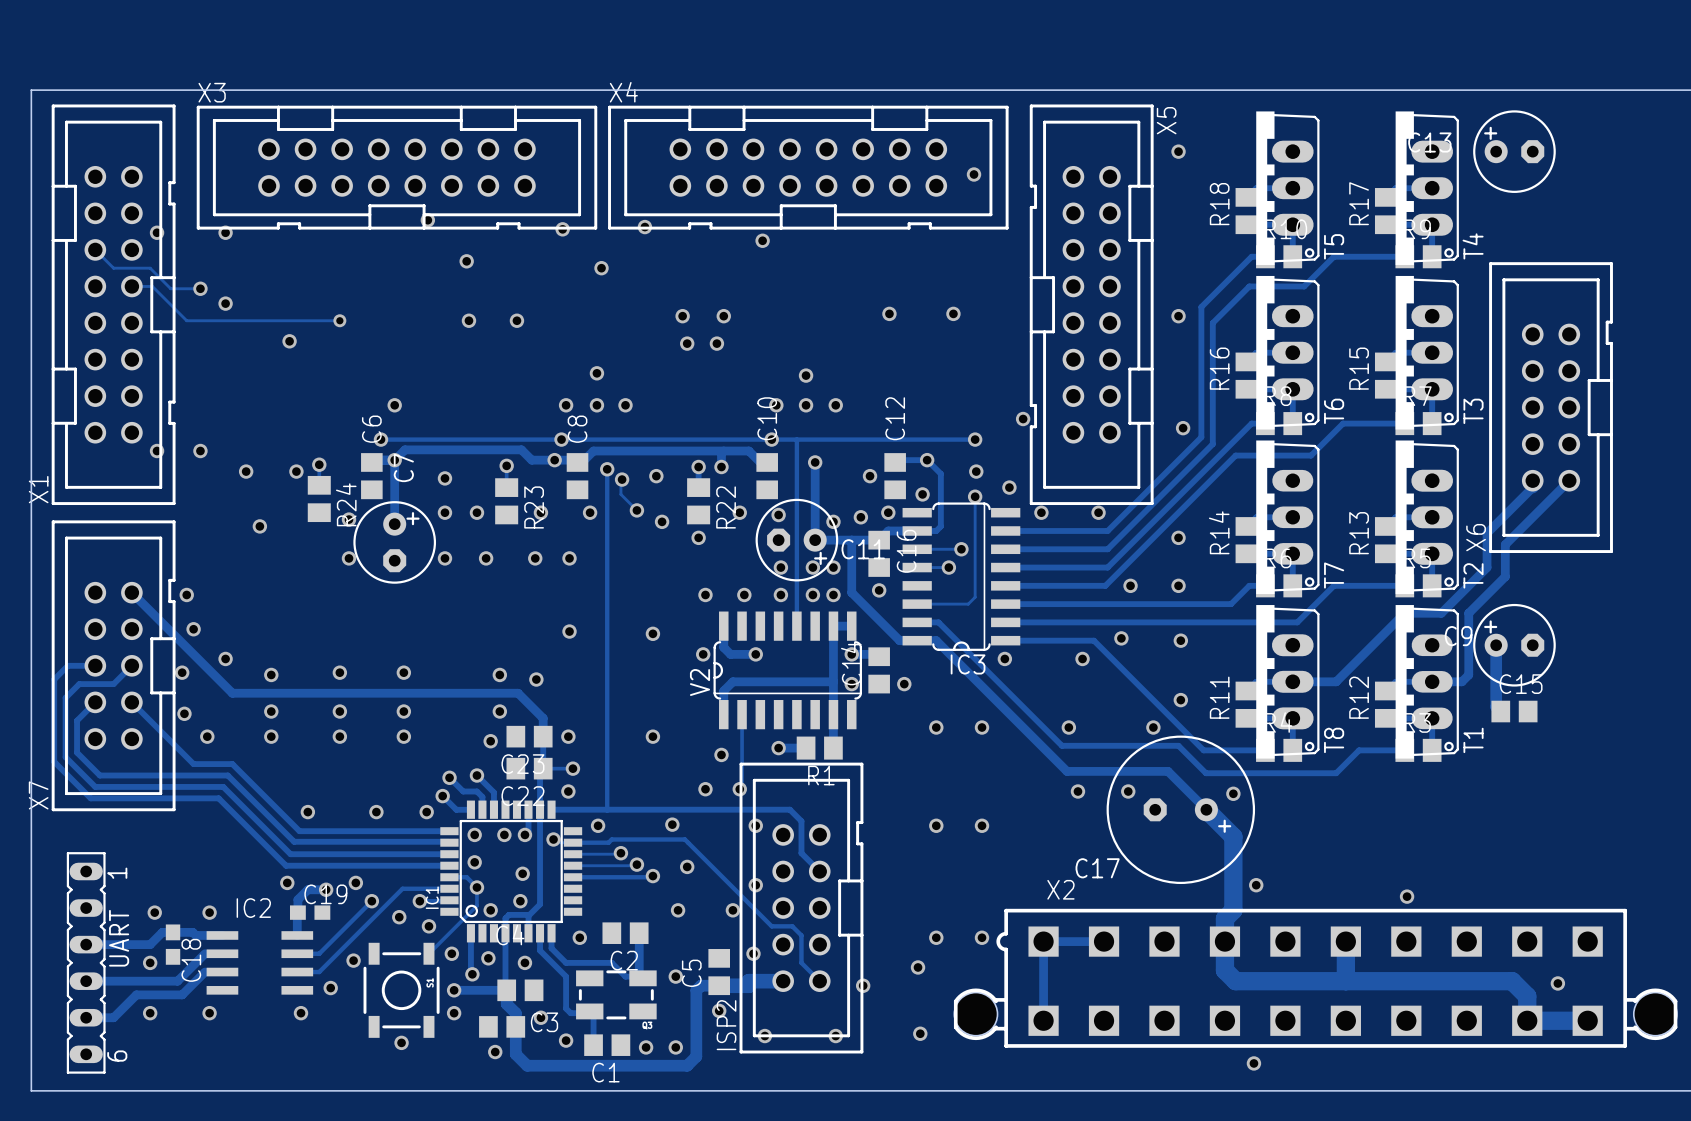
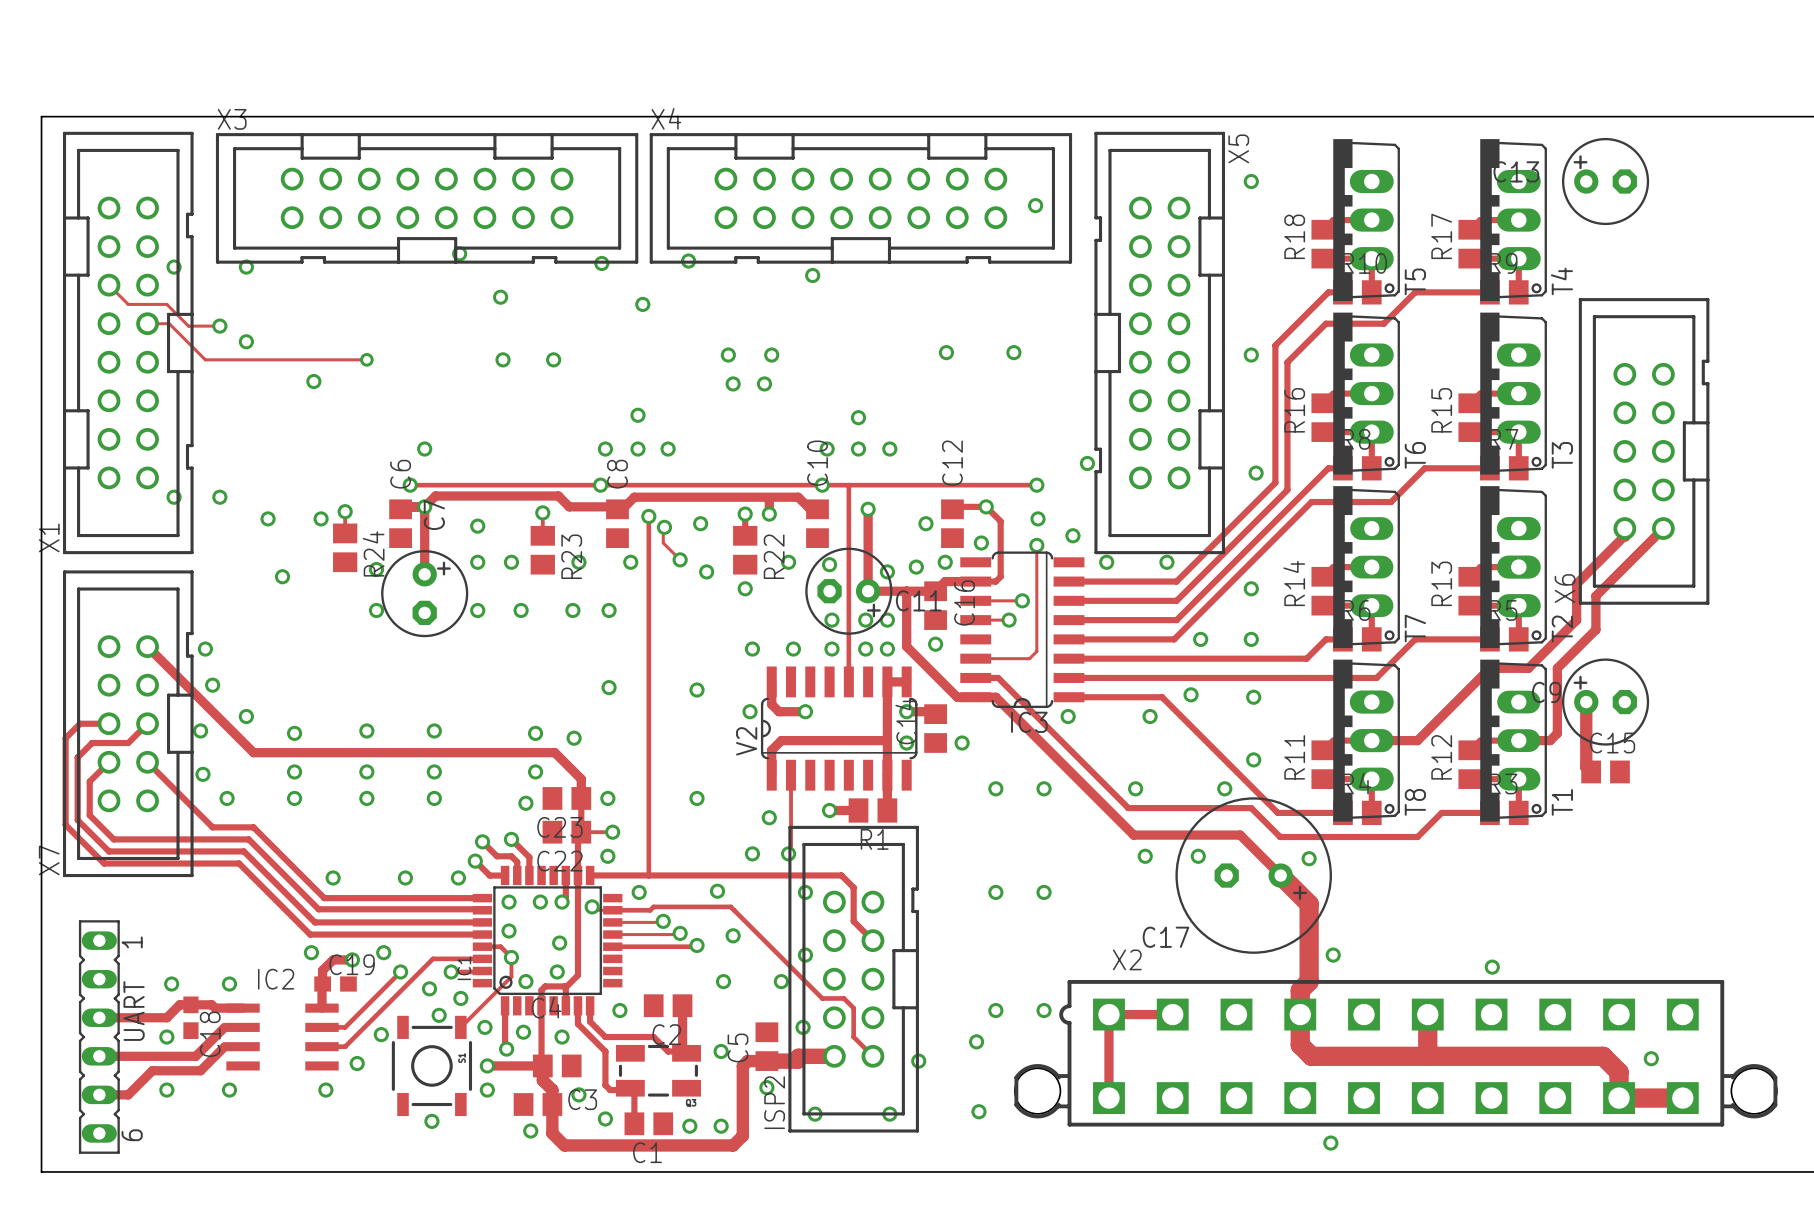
via: (554, 460) -> none
via: none -> (439, 1015)

